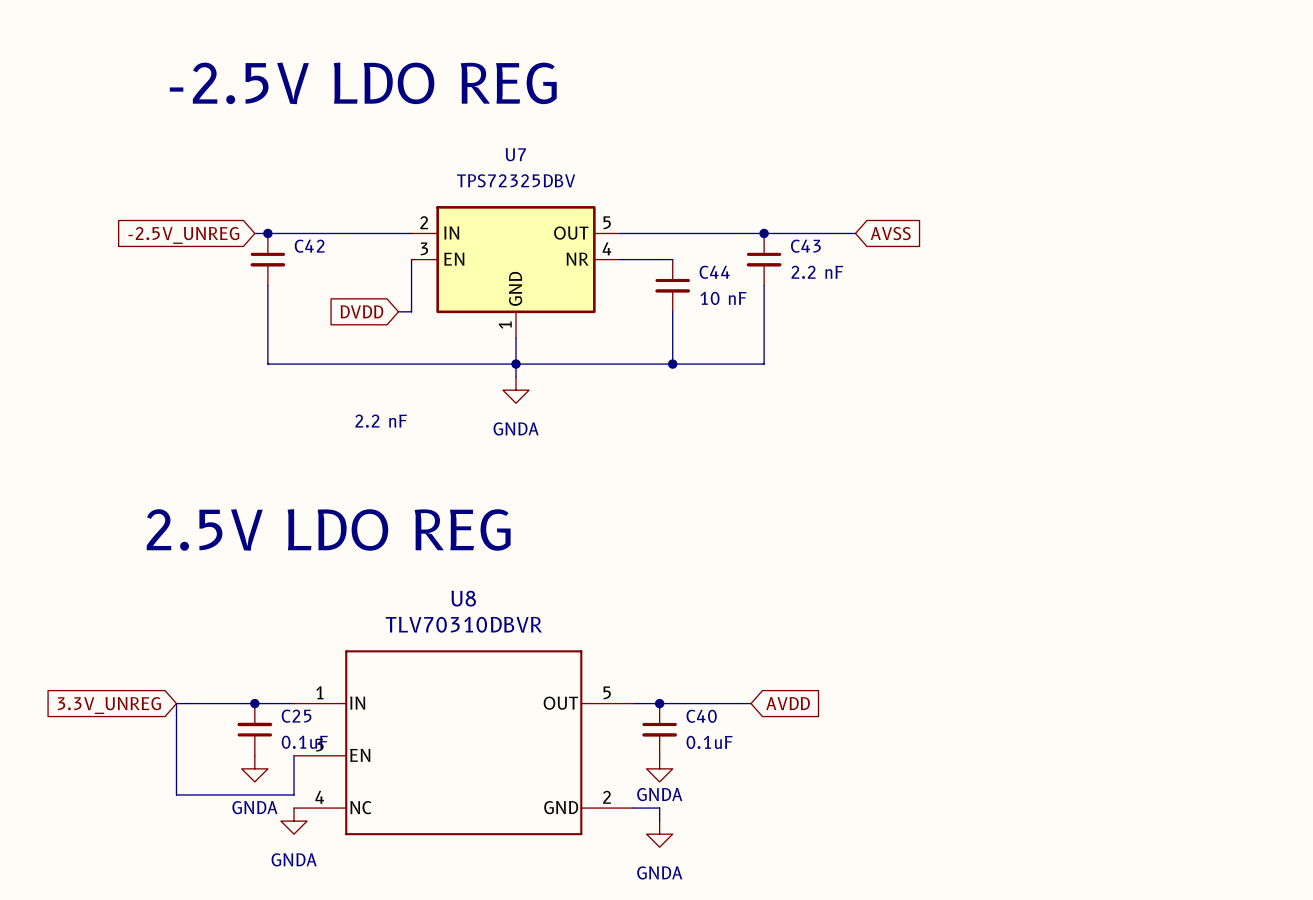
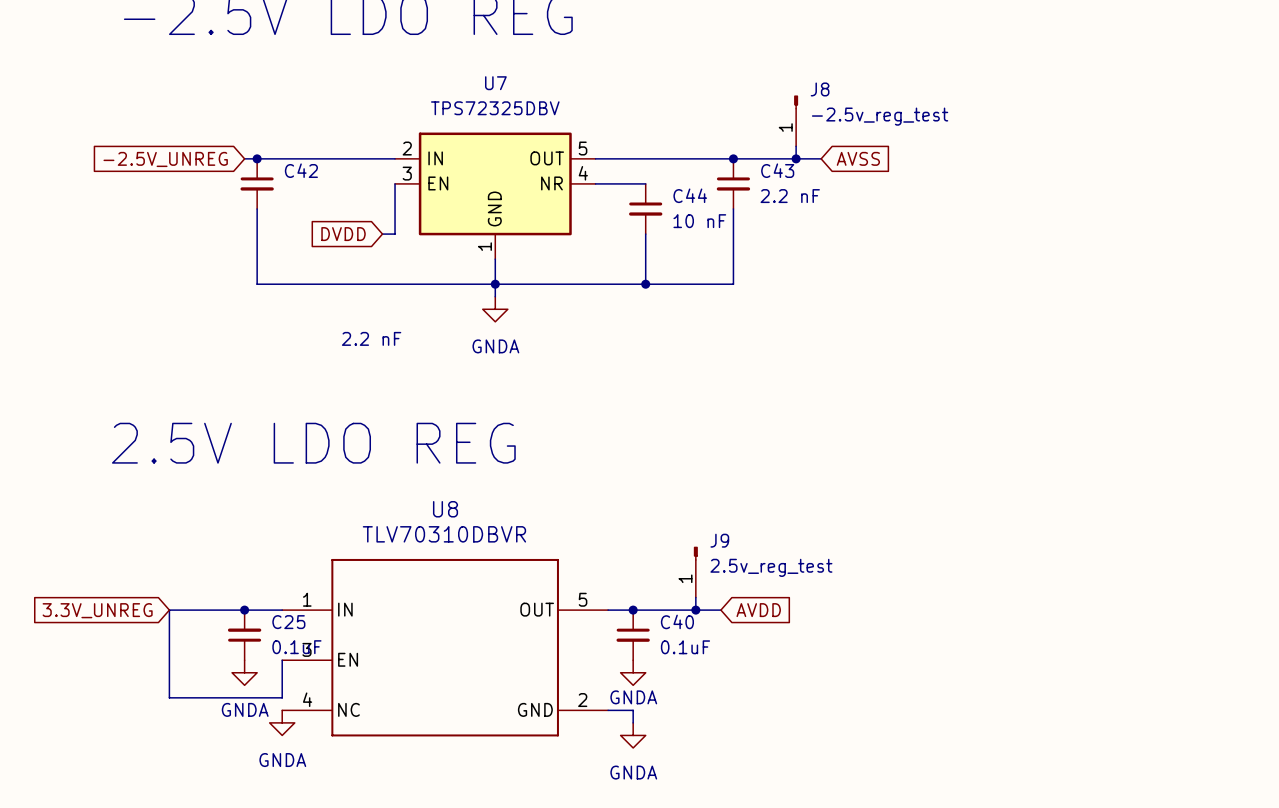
J8: none -> -2.5v_reg_test (796, 120)
wire: none -> (796, 146) (796, 158)
junction: none -> (796, 158)
J9: none -> 2.5v_reg_test (695, 572)
wire: none -> (695, 597) (695, 610)
junction: none -> (695, 610)

